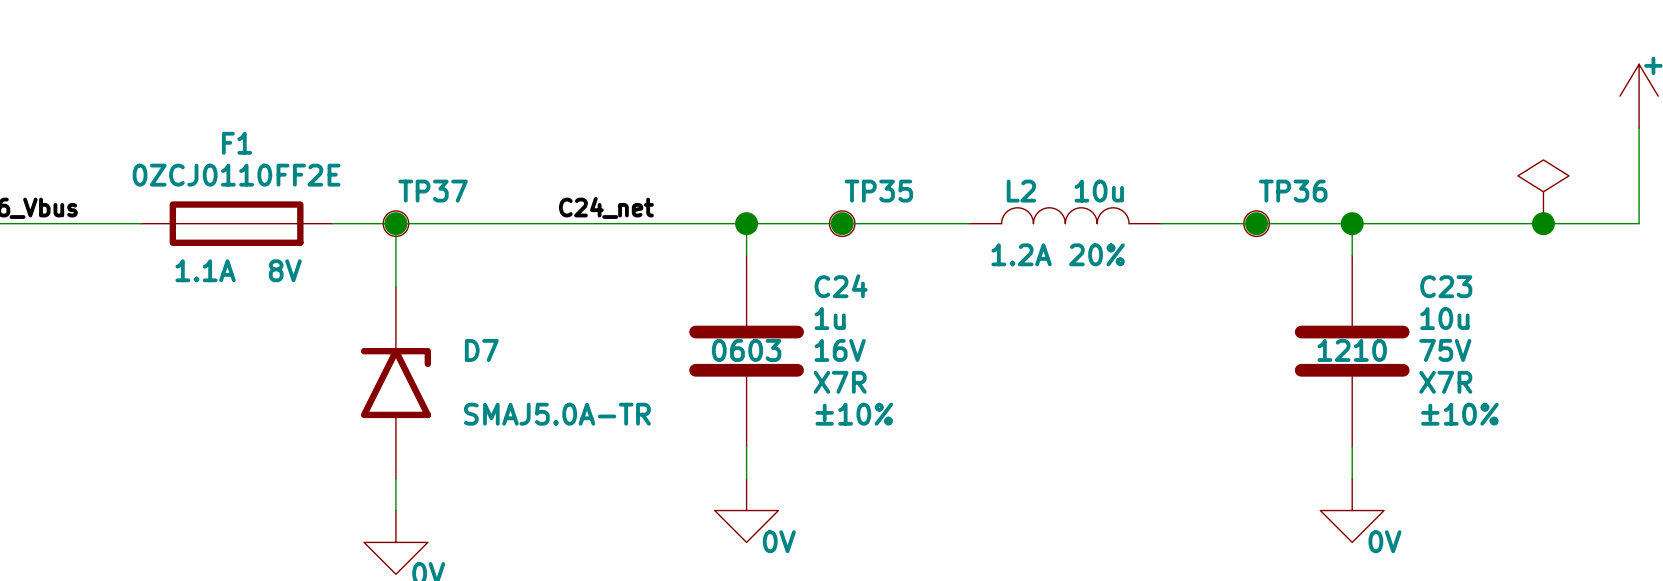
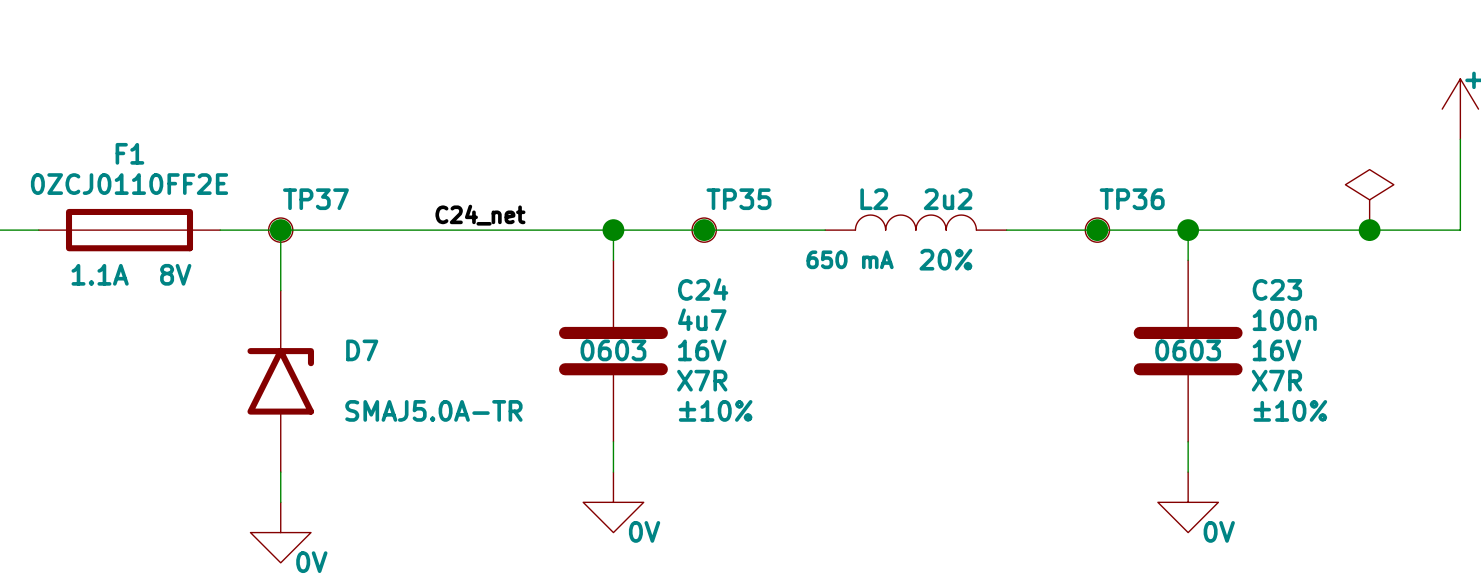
L2 value: 10u (1099, 191) -> 2u2 (948, 199)
L2 text: none -> 650 mA (850, 259)
L2 text: 1.2A (1021, 254) -> none
C24 value: 1u (830, 318) -> 4u7 (702, 319)
C23 value: 10u (1444, 318) -> 100n (1284, 320)
C23 text: 1210 (1352, 350) -> 0603 (1188, 350)
C23 text: 75V (1445, 350) -> 16V (1276, 350)

